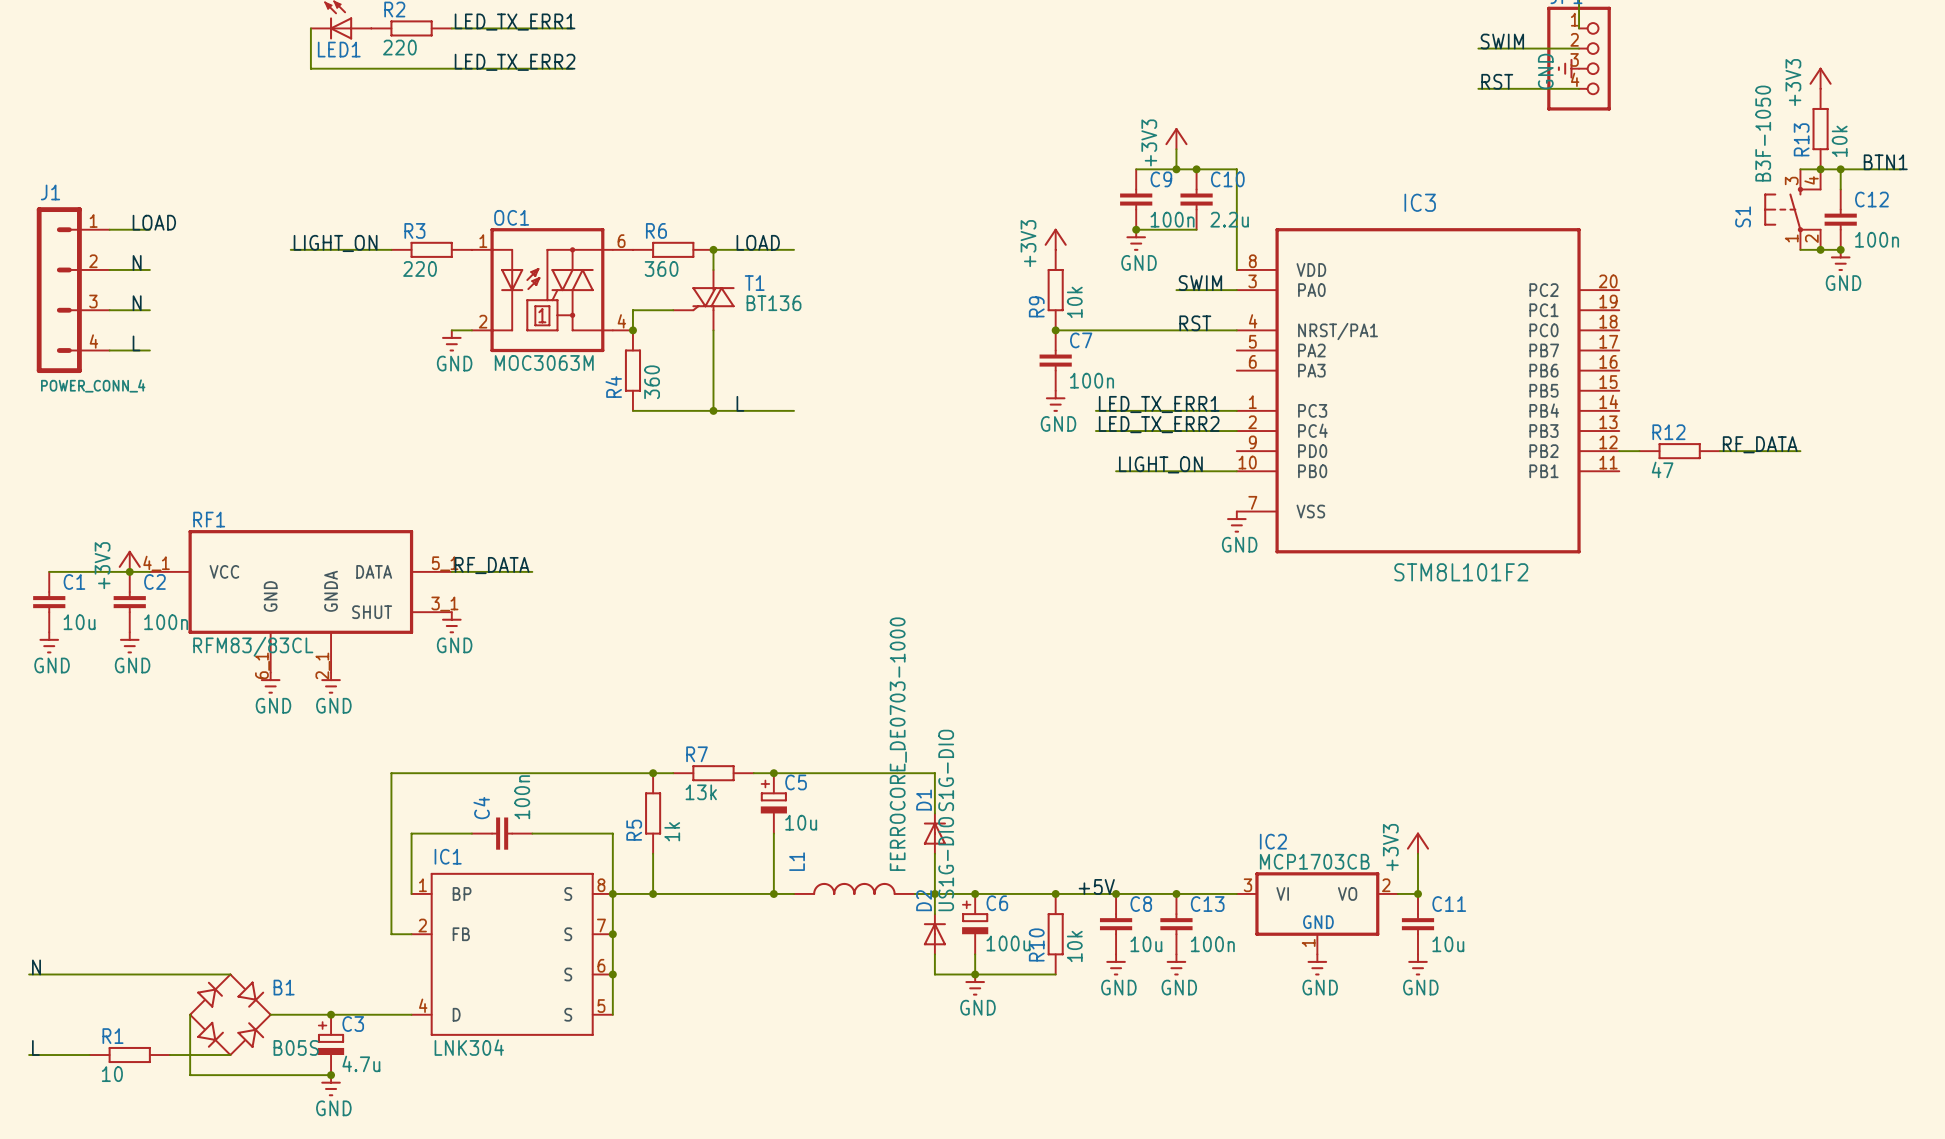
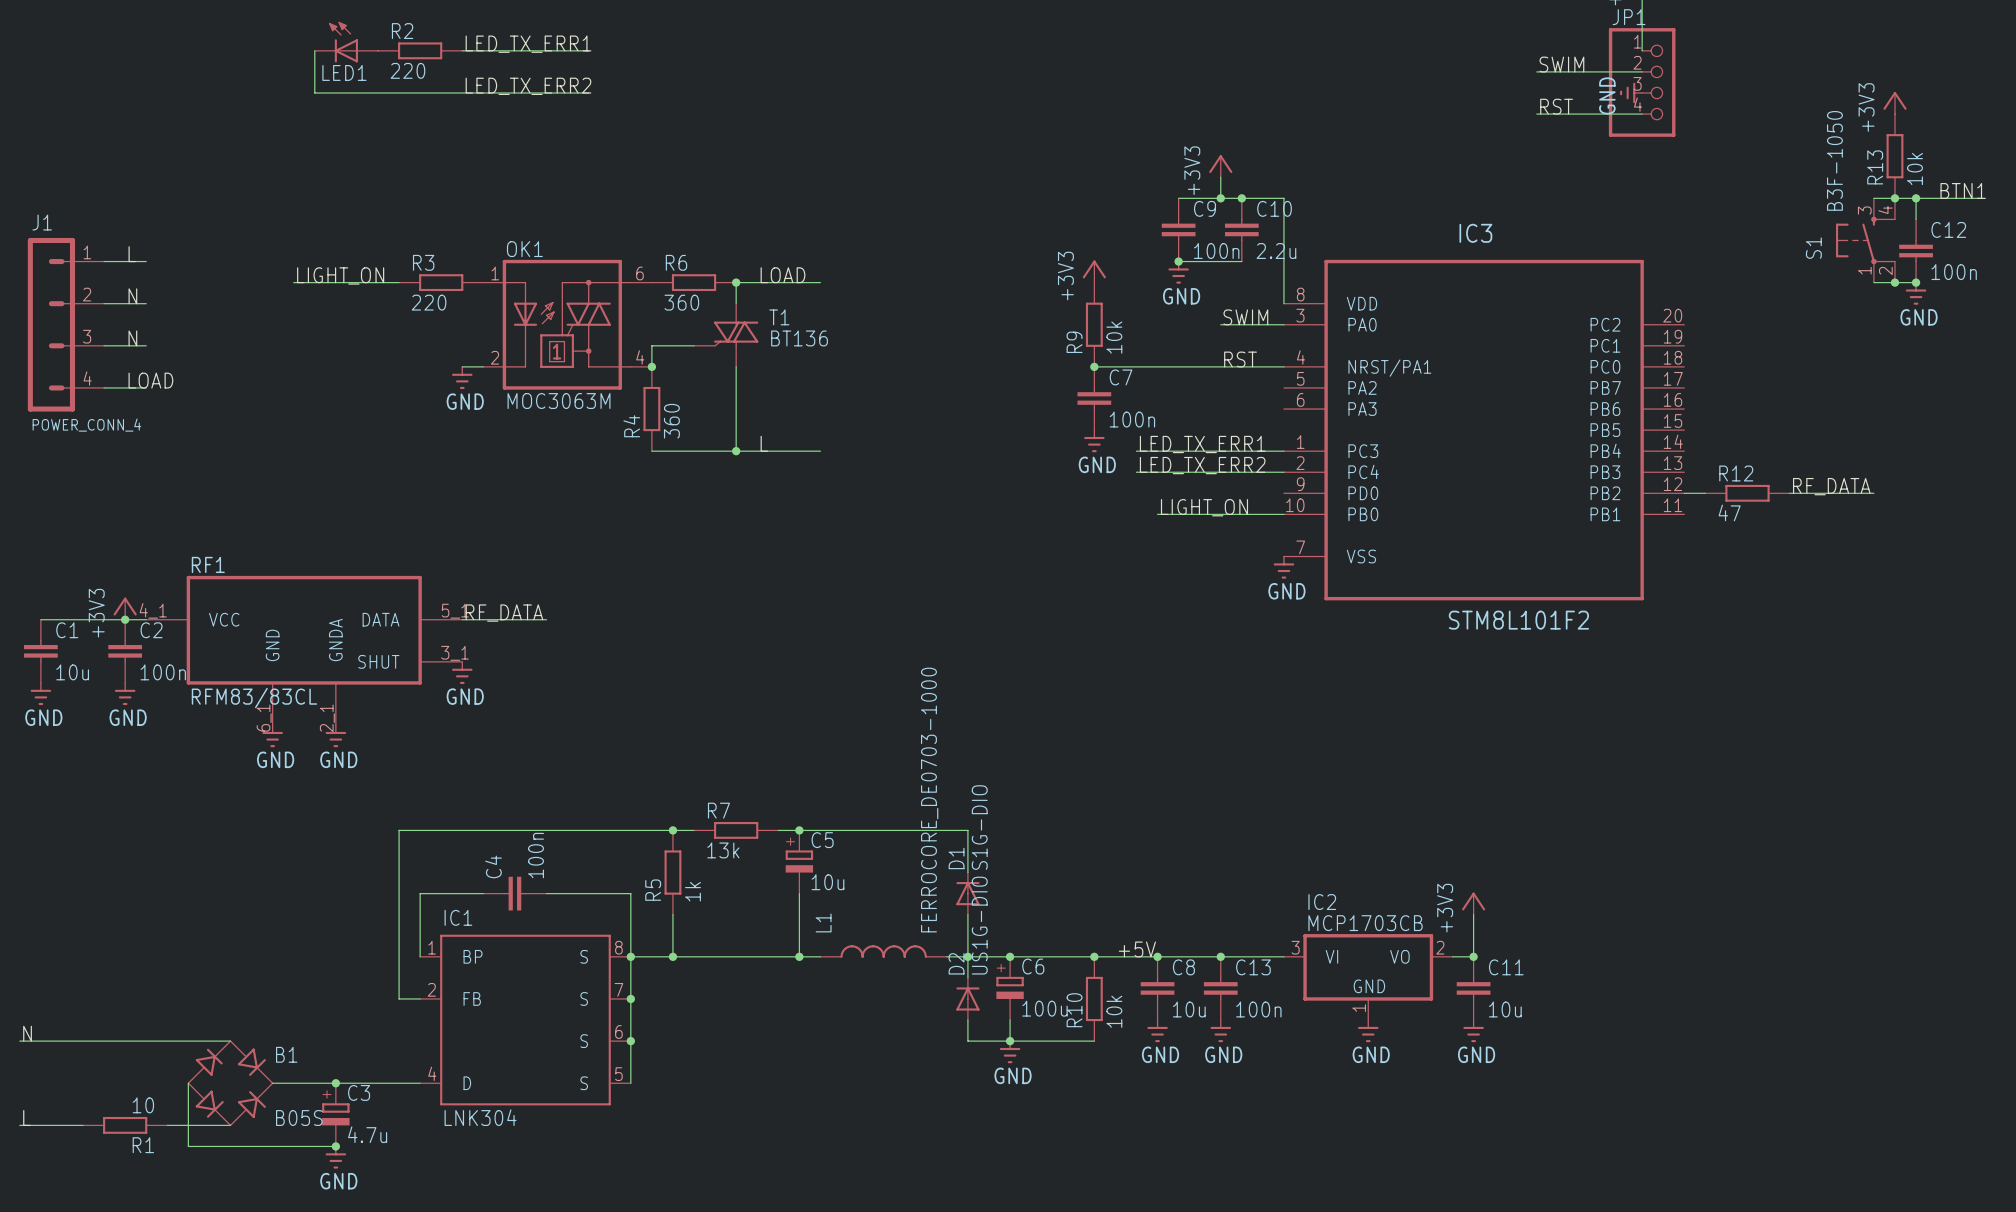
OC1 name: OC1 (511, 217) -> OK1 (524, 249)
label: LOAD (154, 222) -> L (132, 254)
label: L (136, 343) -> LOAD (150, 380)
R1 name position: R1 (112, 1036) -> R1 (143, 1145)
R1 value position: 10 (112, 1074) -> 10 (143, 1105)

